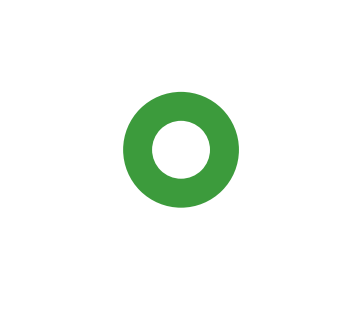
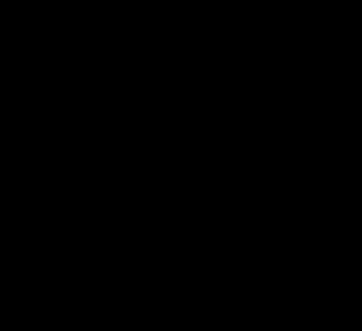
part: (181, 149) -> none

